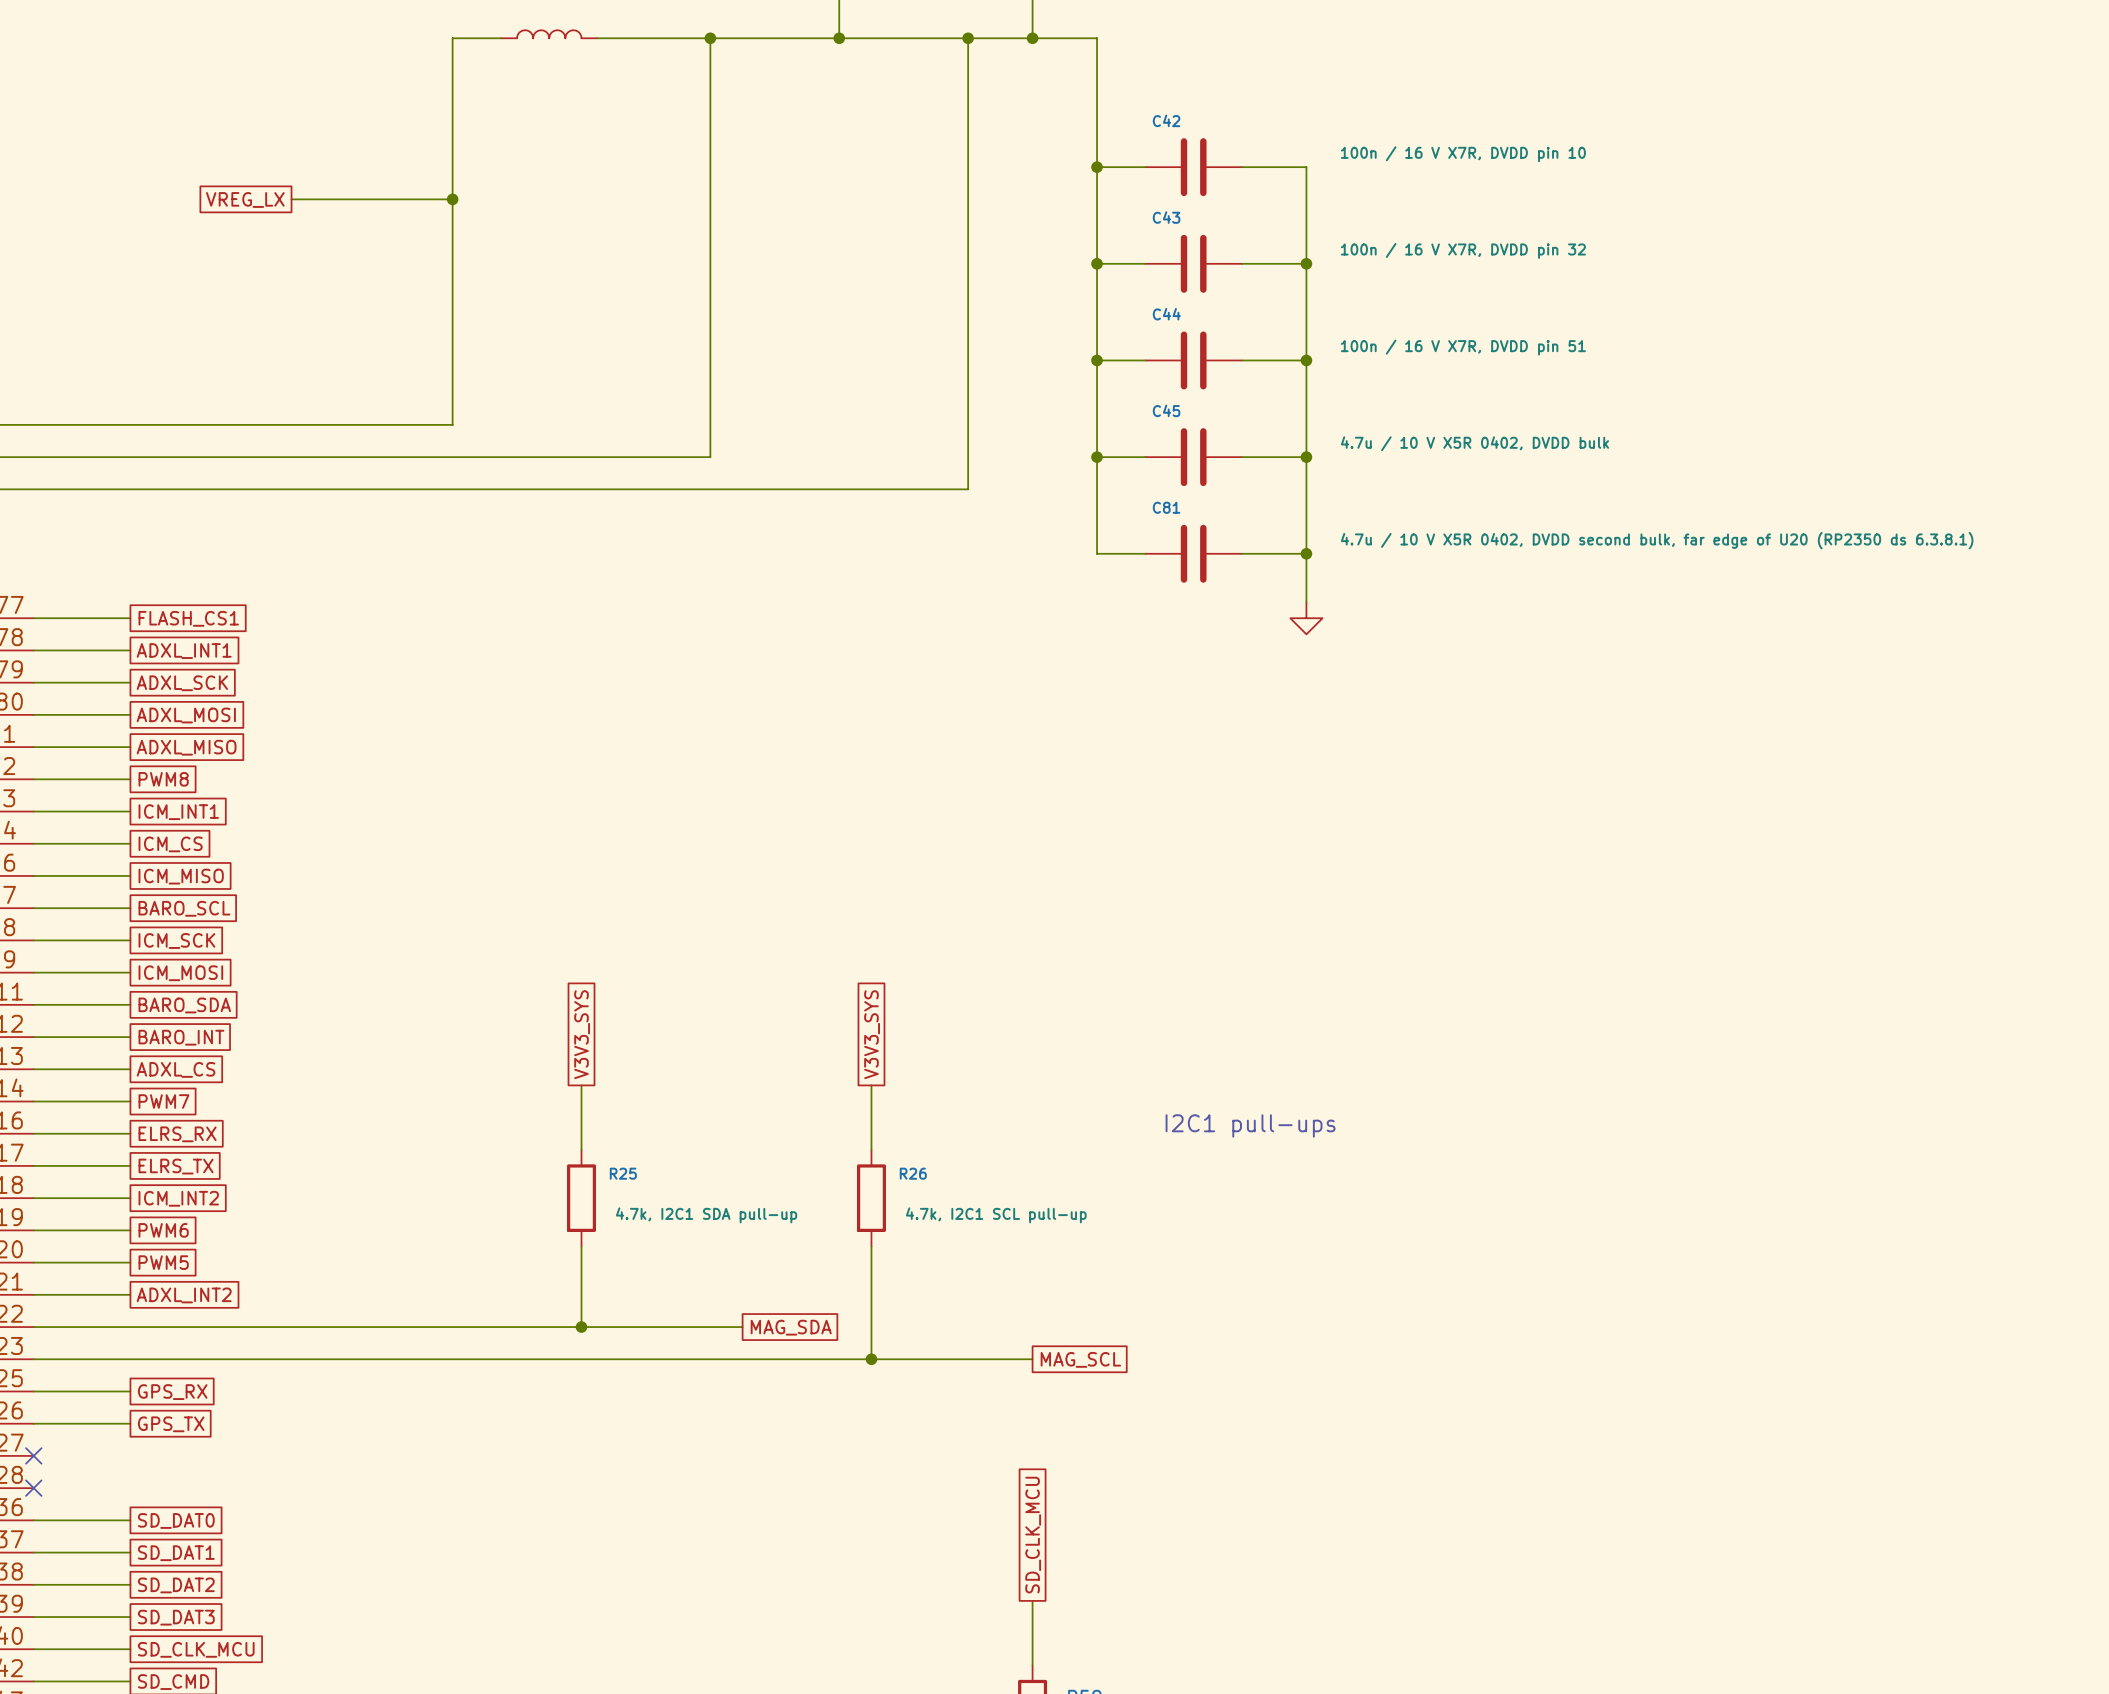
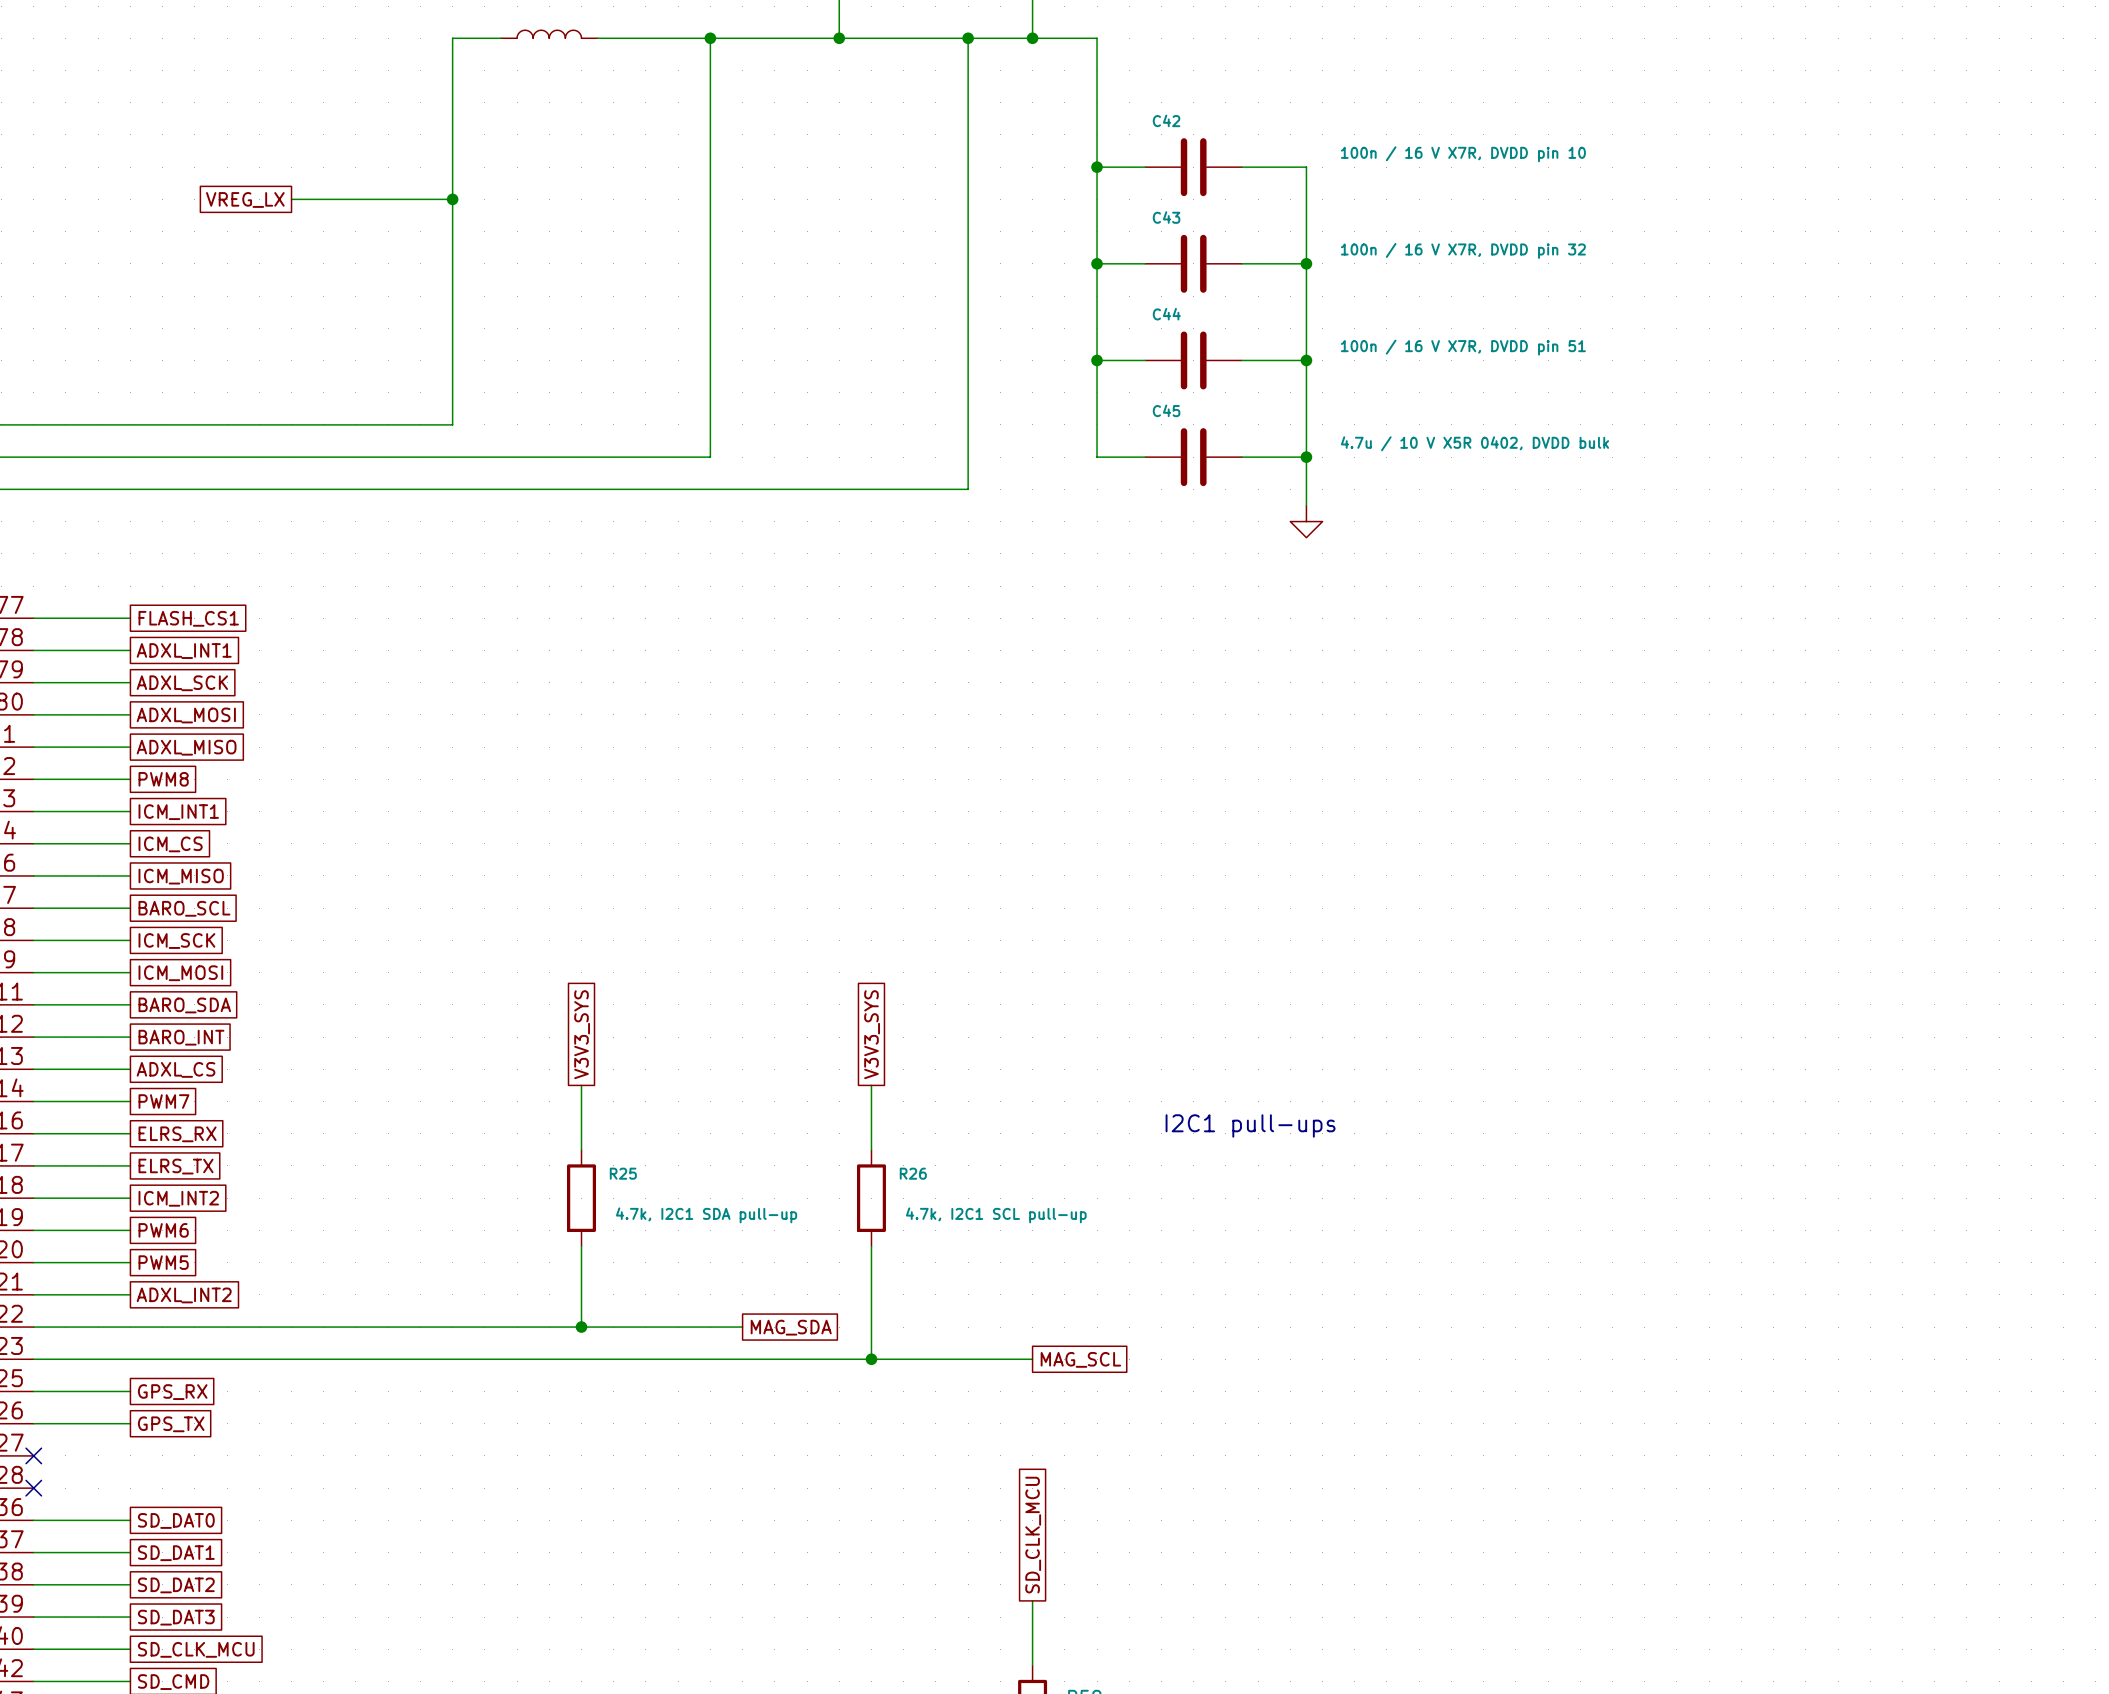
wire: (1097, 457) (1097, 553) (1145, 553) -> none
junction: (1097, 457) -> none
wire: (1306, 505) (1306, 602) -> none
C81: 4.7u / 10 V X5R 0402, DVDD second bulk, far edge of U20 (RP2350 ds 6.3.8.1) (1193, 553) -> none
wire: (1241, 553) (1306, 553) -> none
junction: (1306, 553) -> none
power symbol position: (1306, 618) -> (1306, 521)

